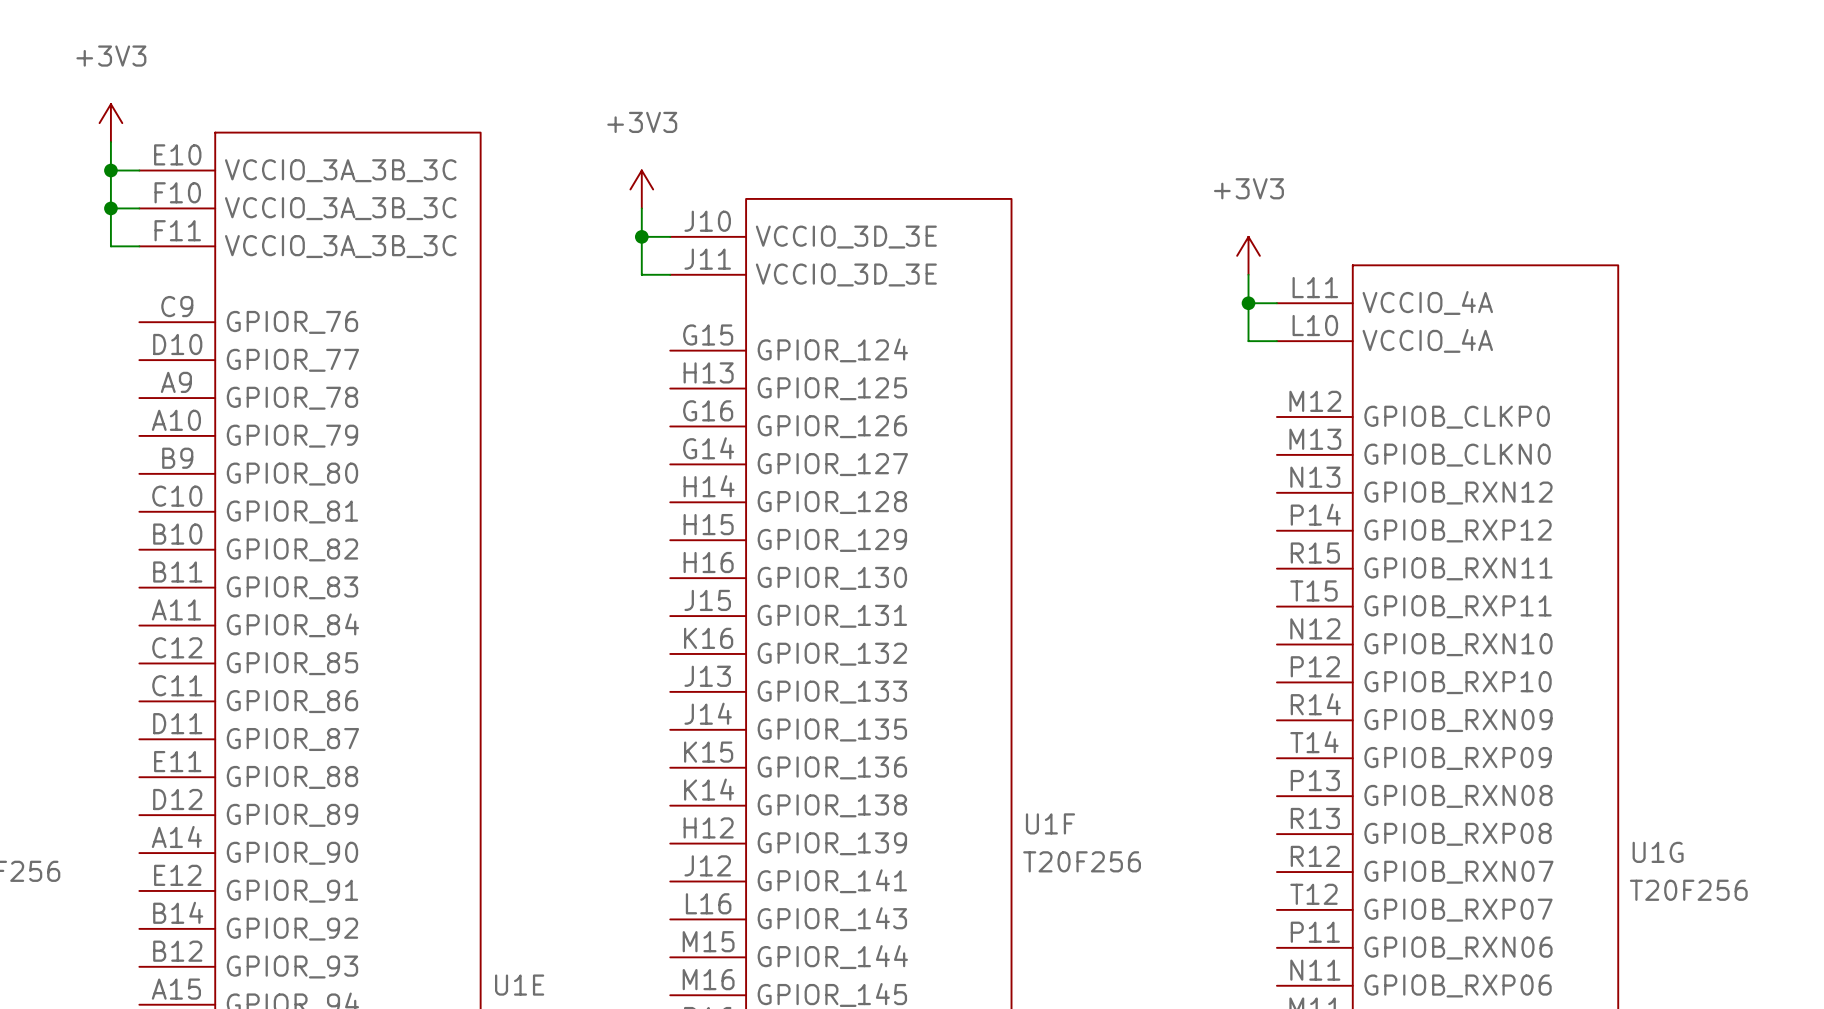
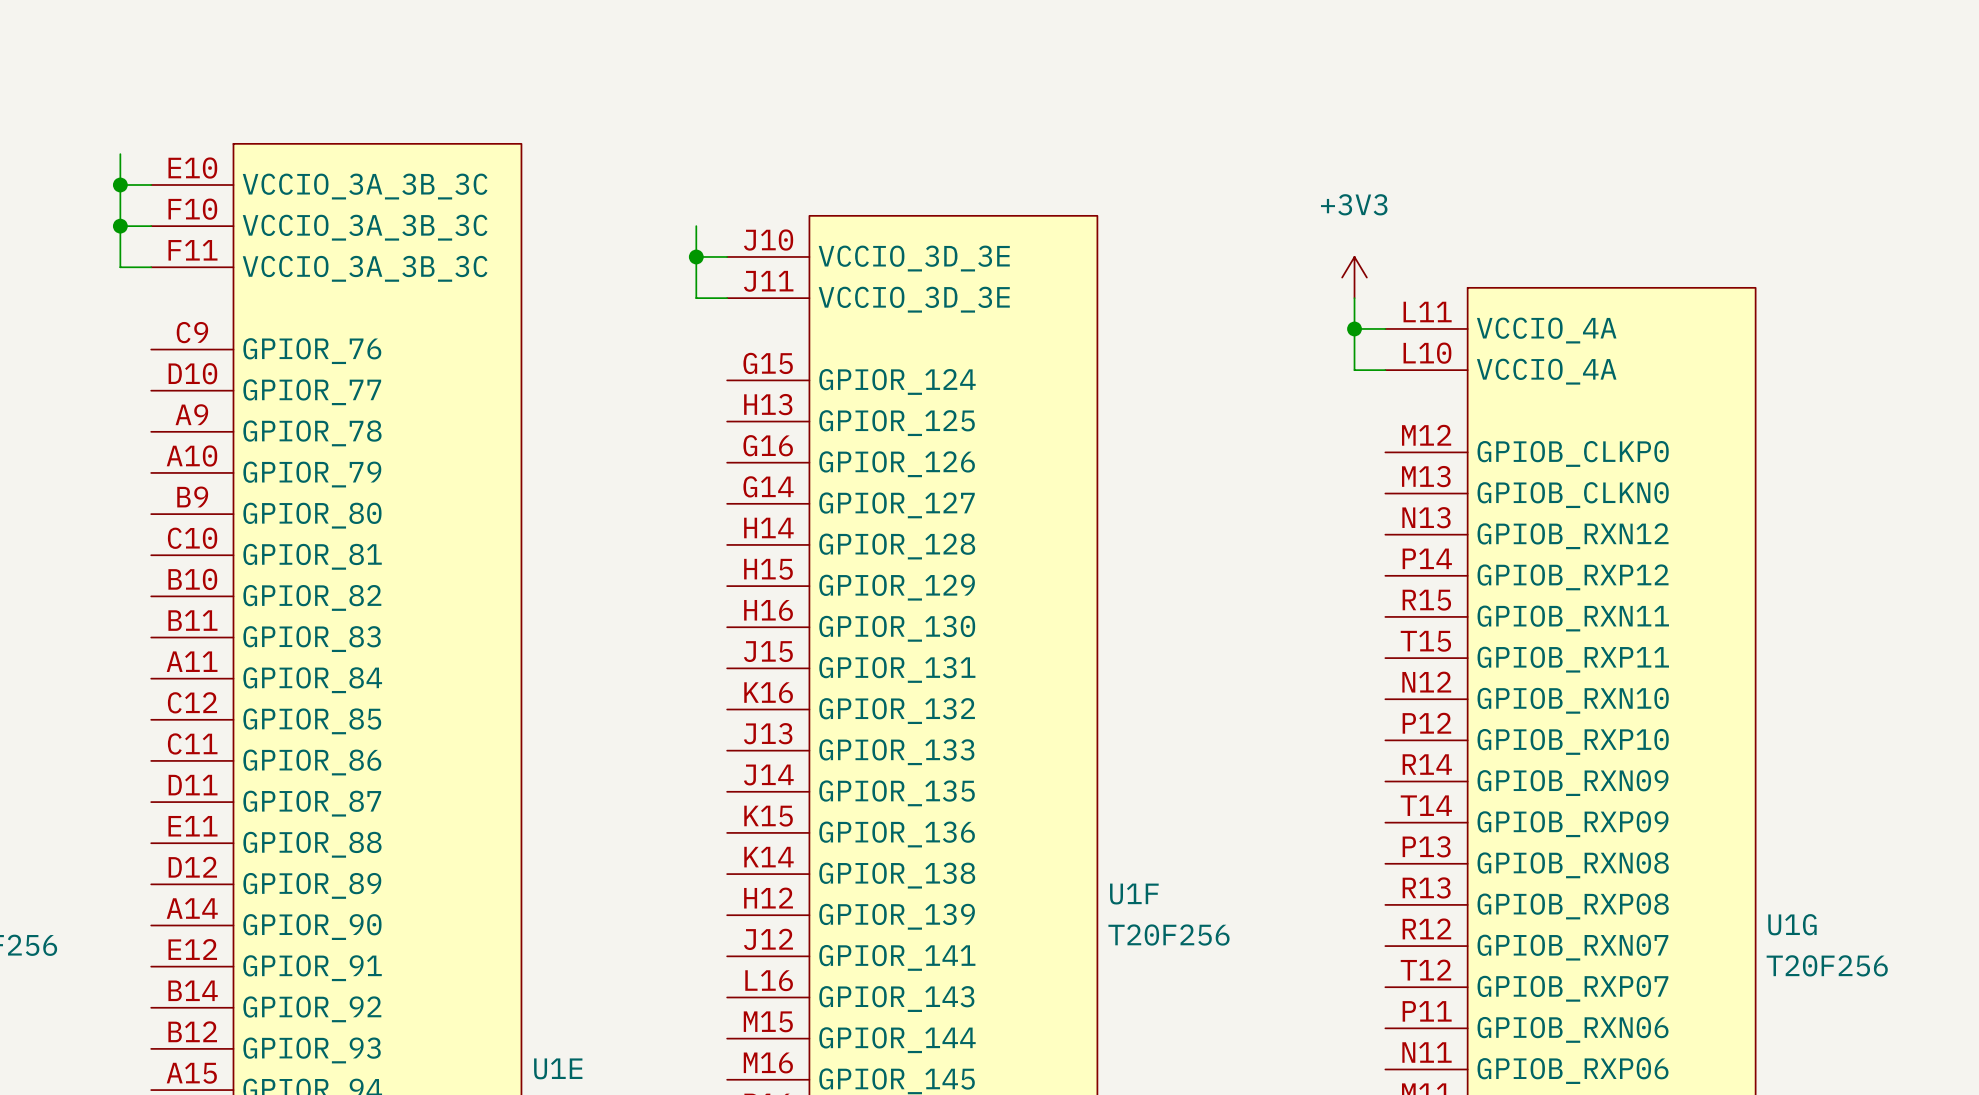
power symbol: +3V3 (110, 123) -> none
power symbol: +3V3 (641, 189) -> none

